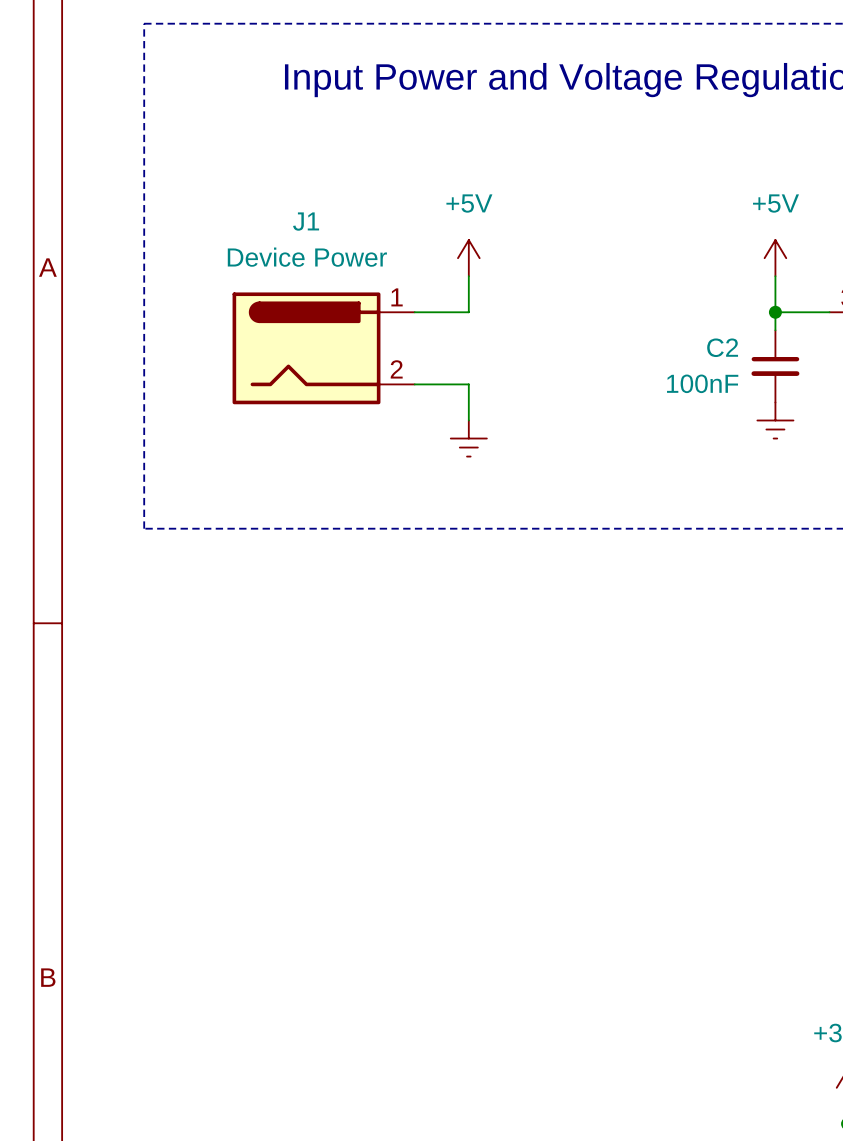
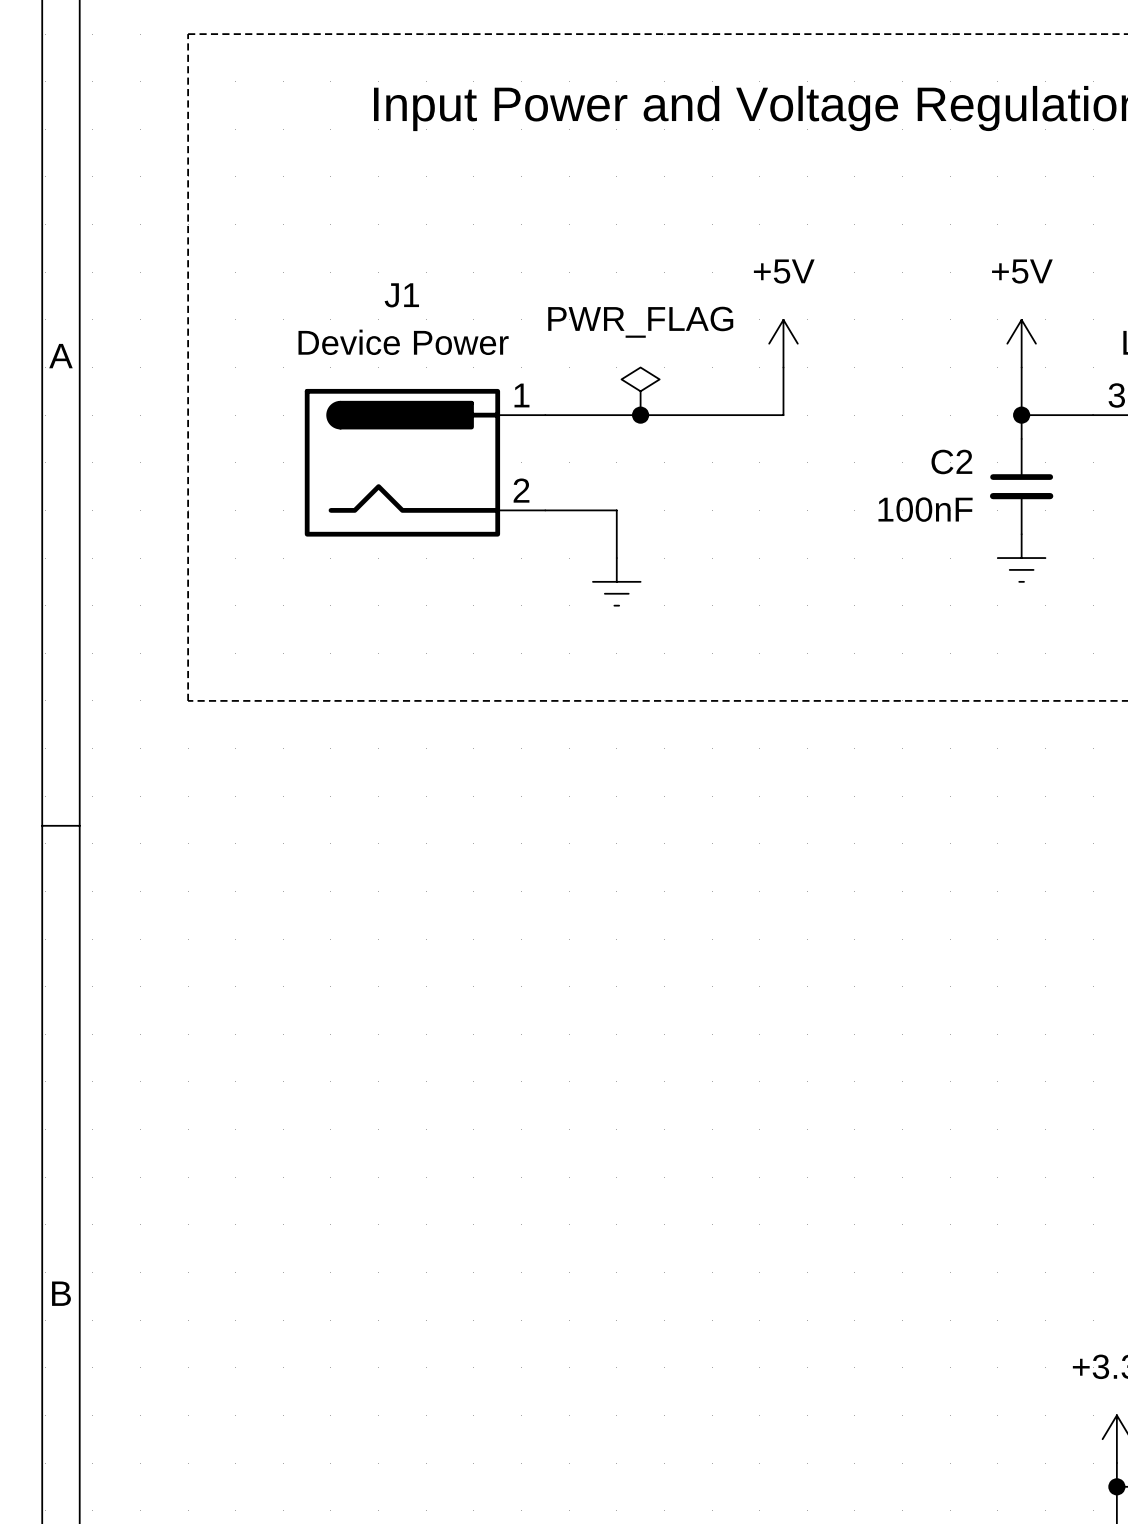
power symbol position: +5V (468, 258) -> +5V (783, 343)
wire: (468, 276) (468, 312) -> (783, 367) (783, 415) (616, 415)
power symbol: none -> PWR_FLAG (640, 391)
junction: none -> (640, 415)

